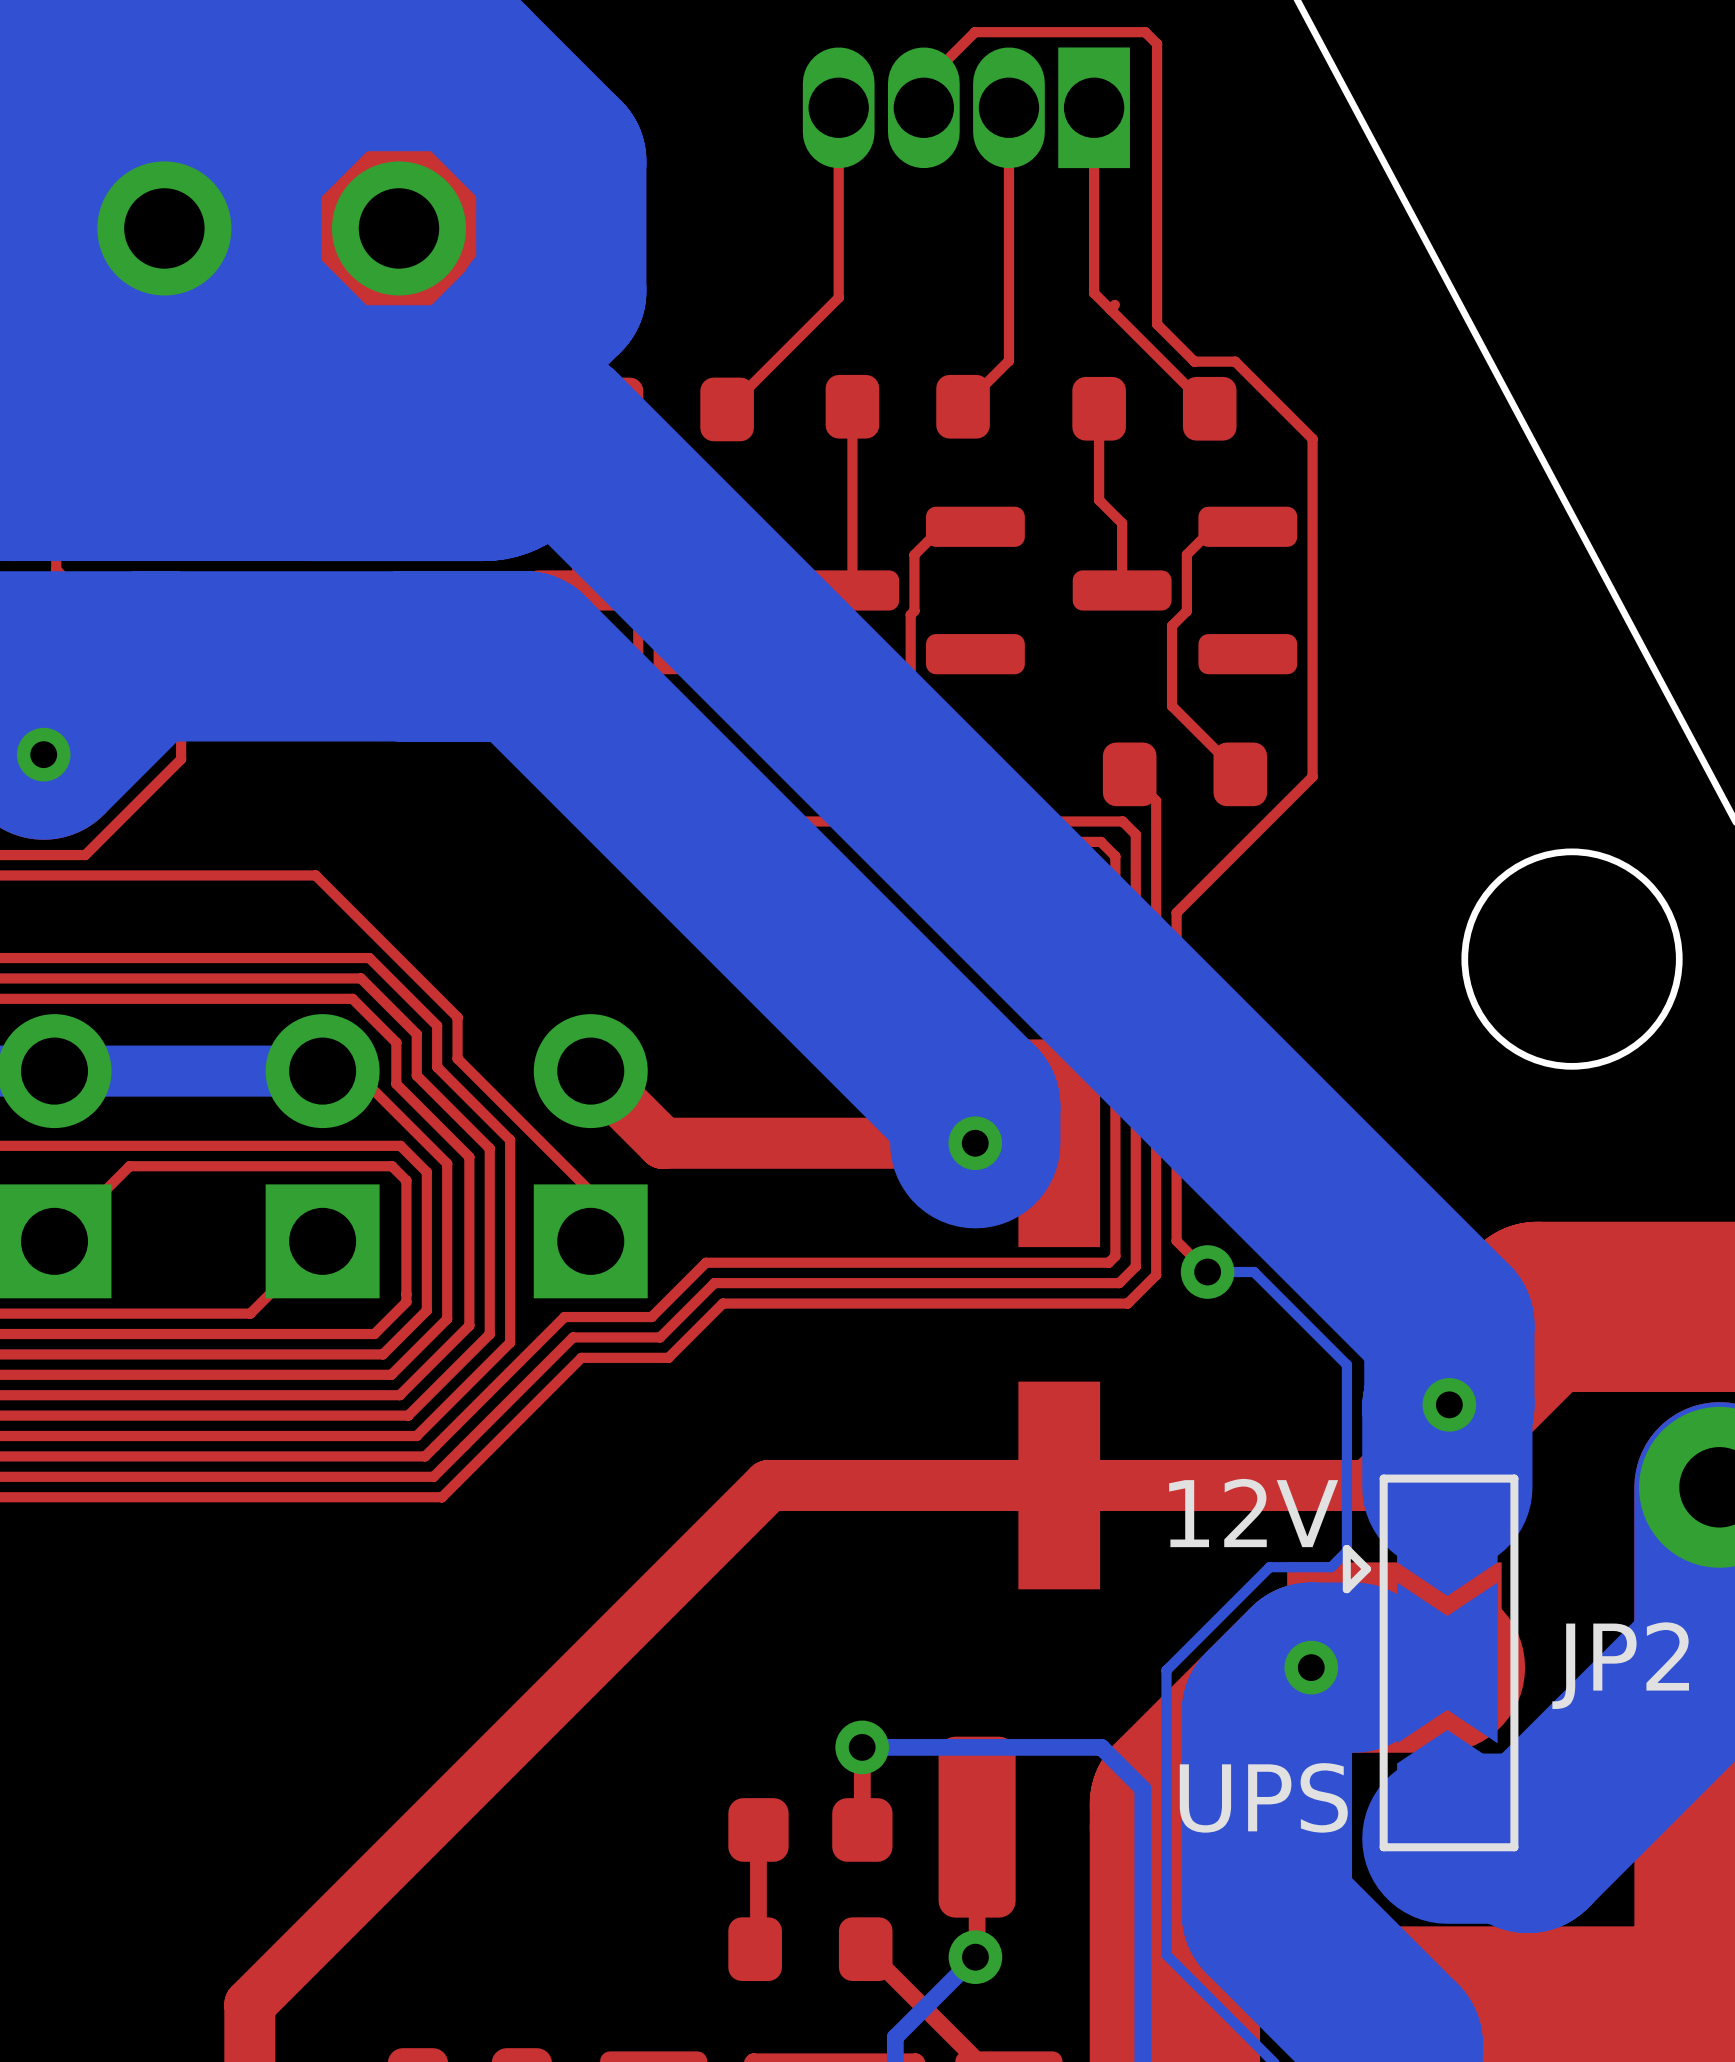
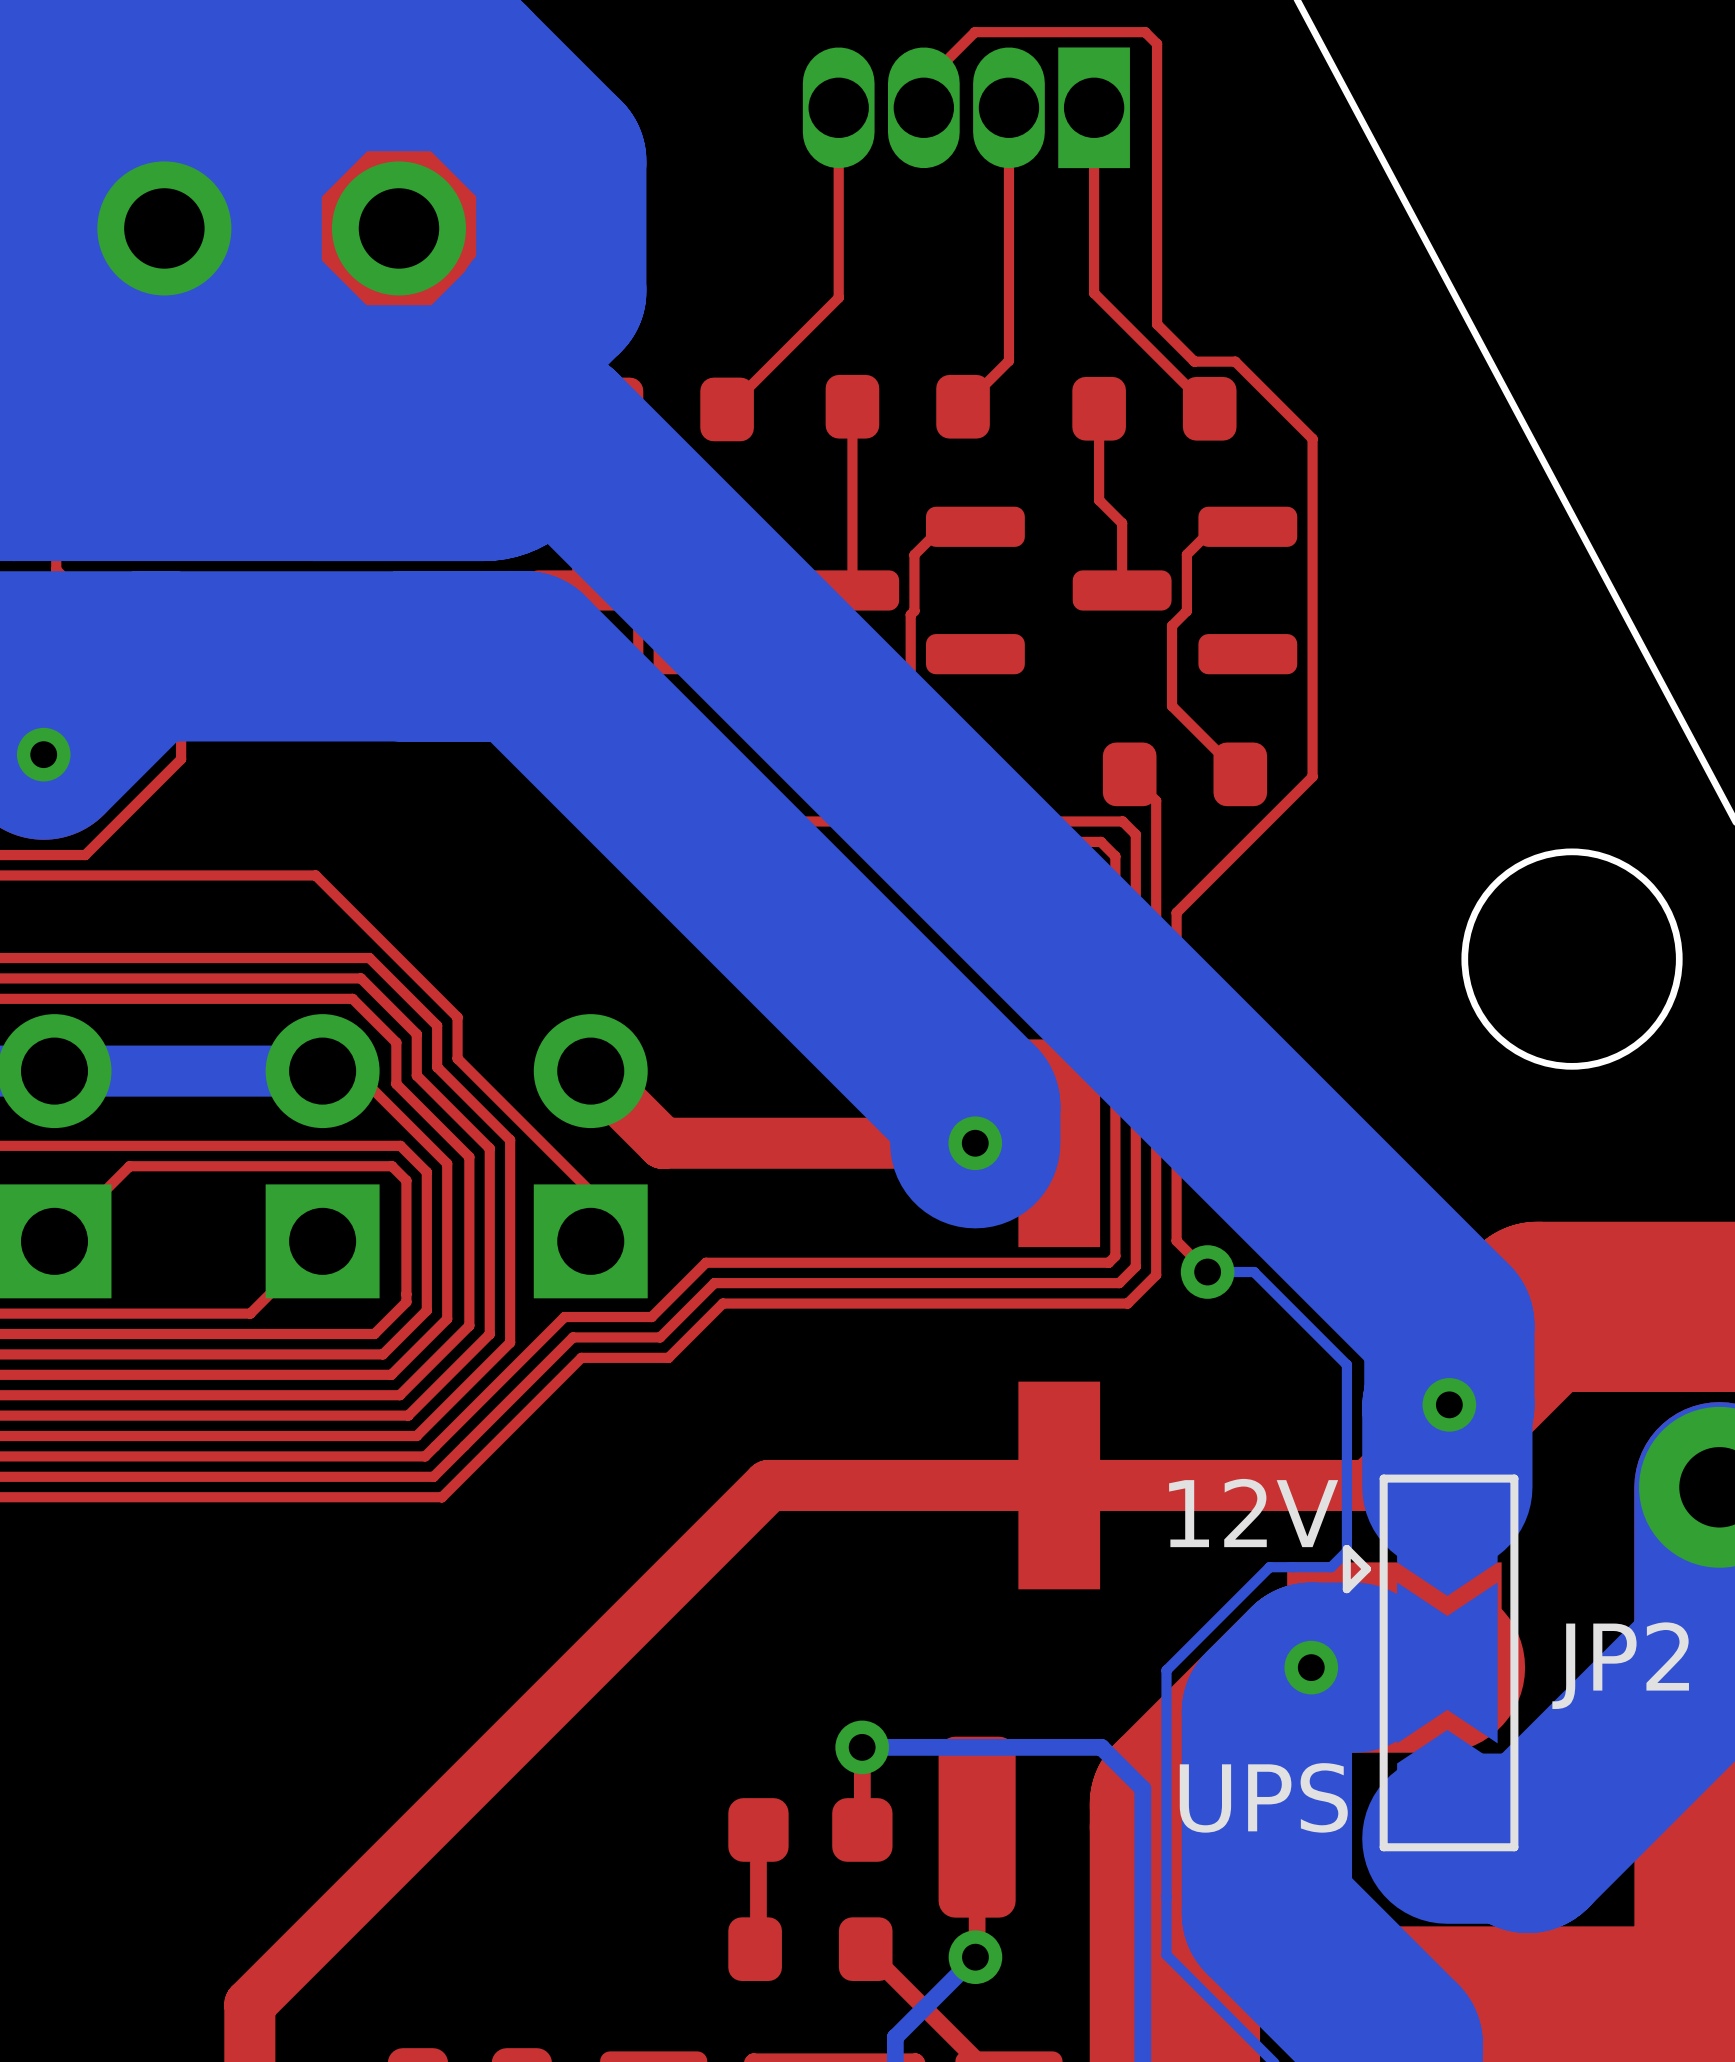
top track: (1114, 304) (1110, 309) -> none

